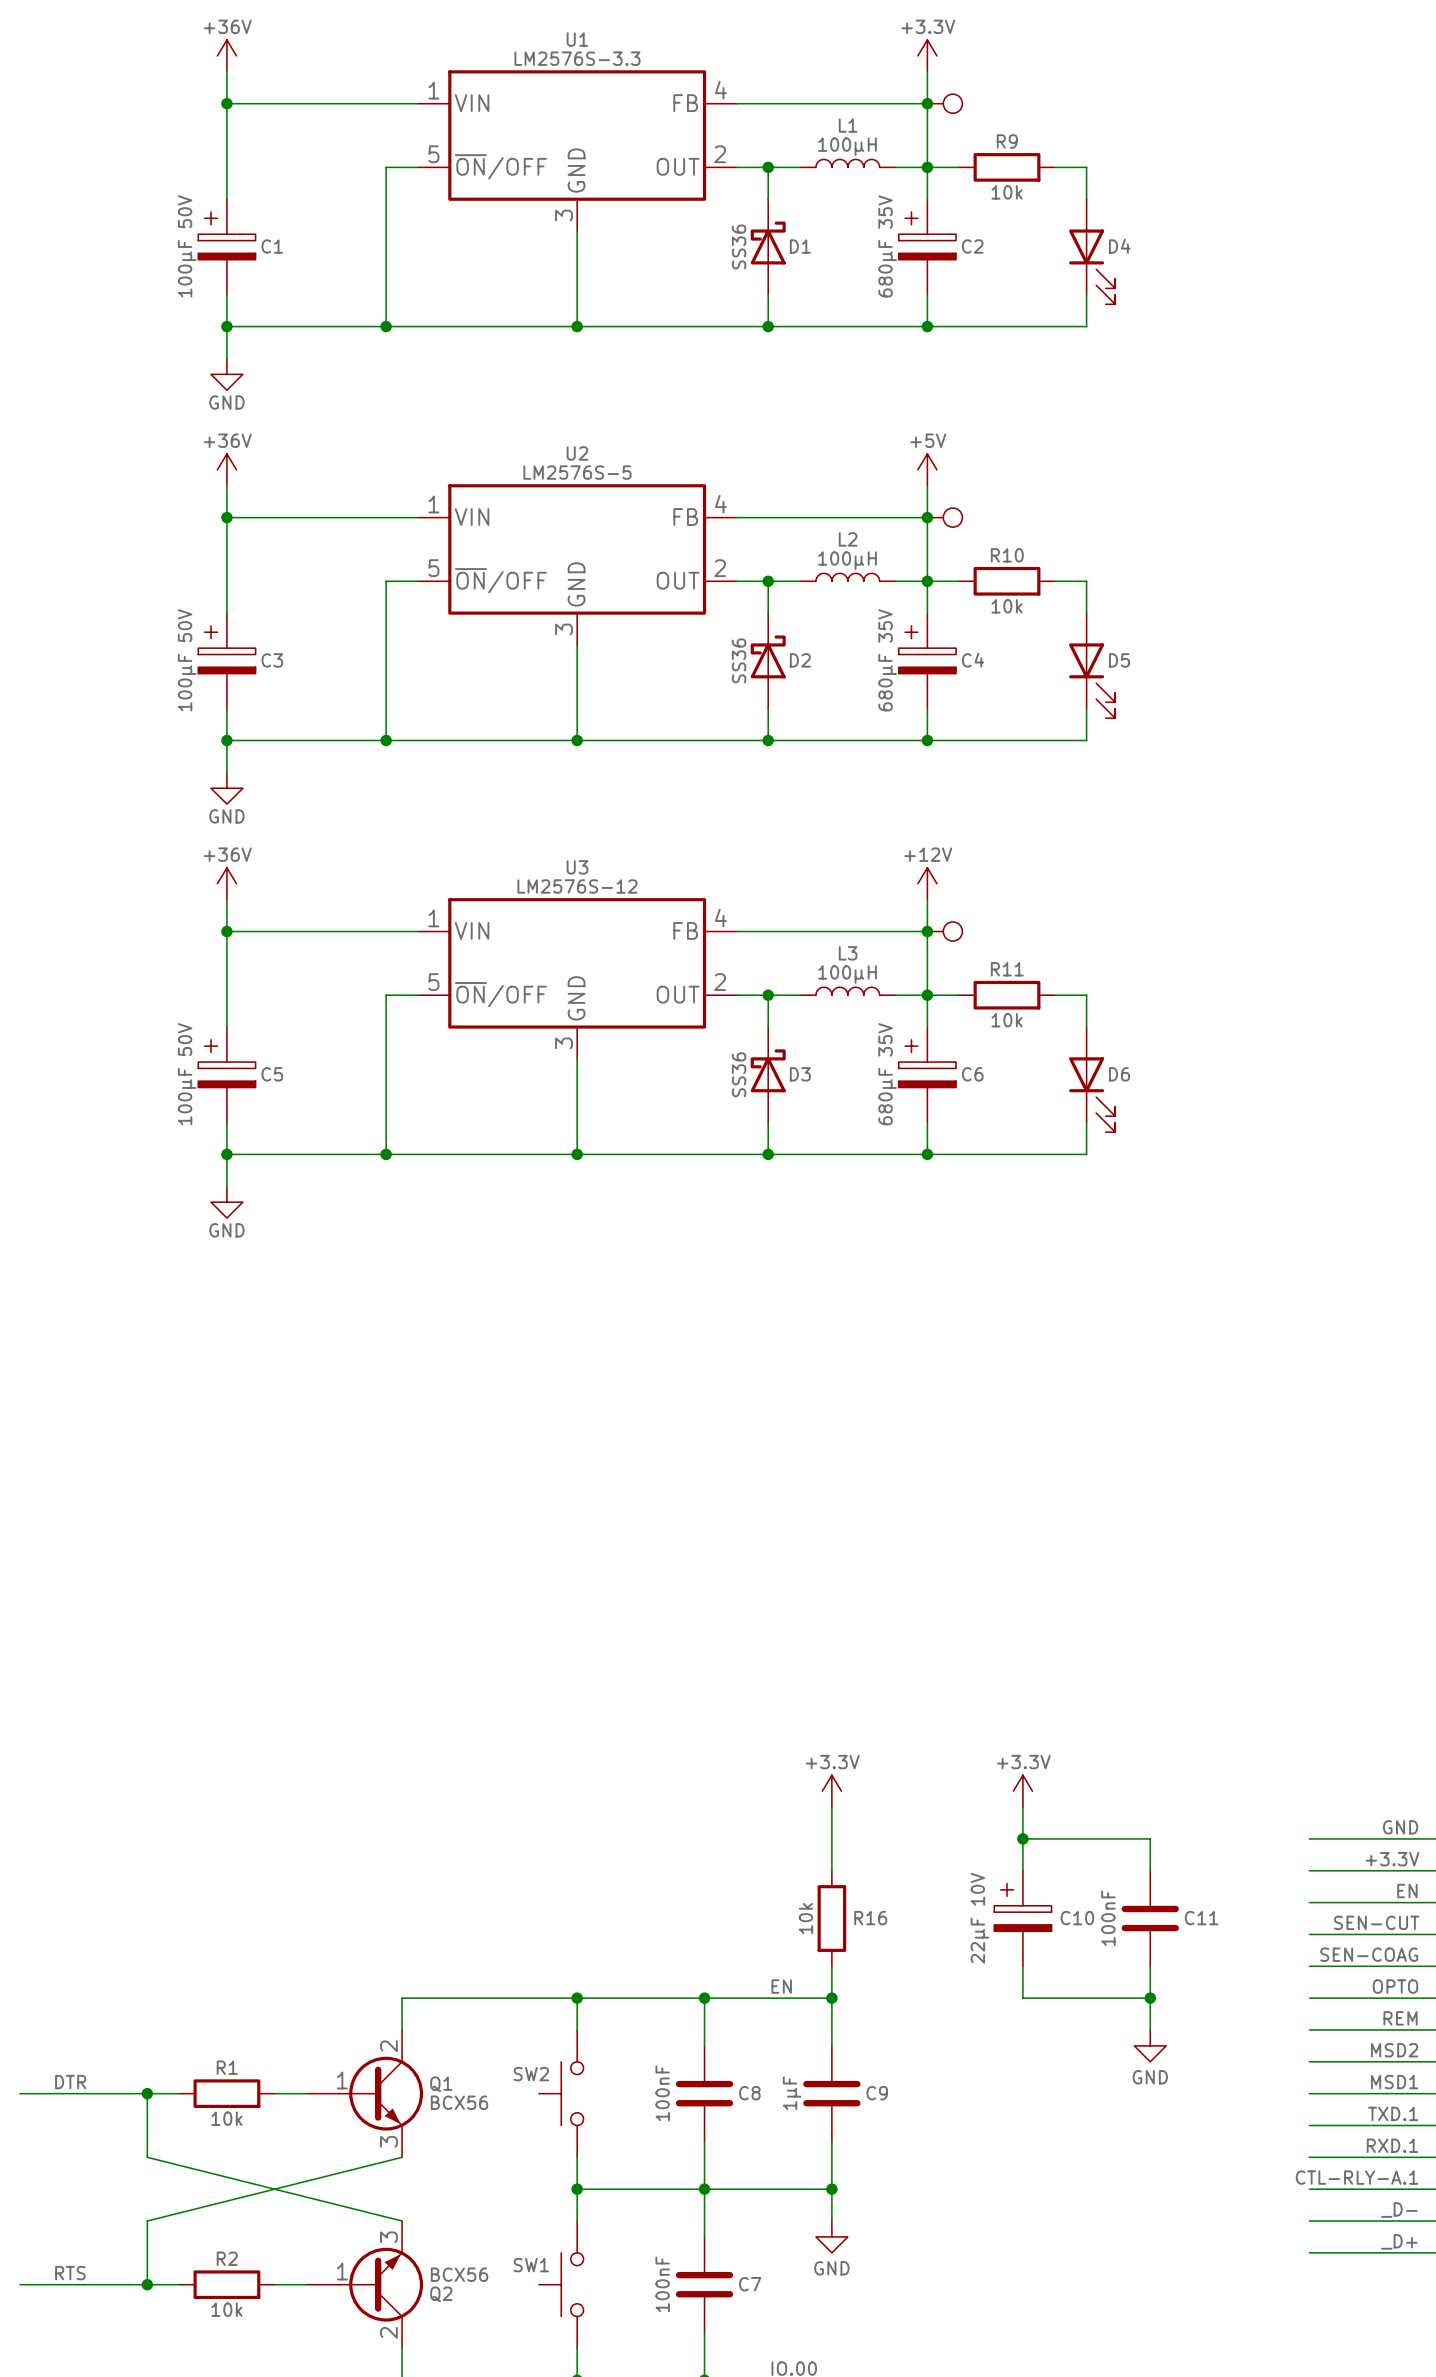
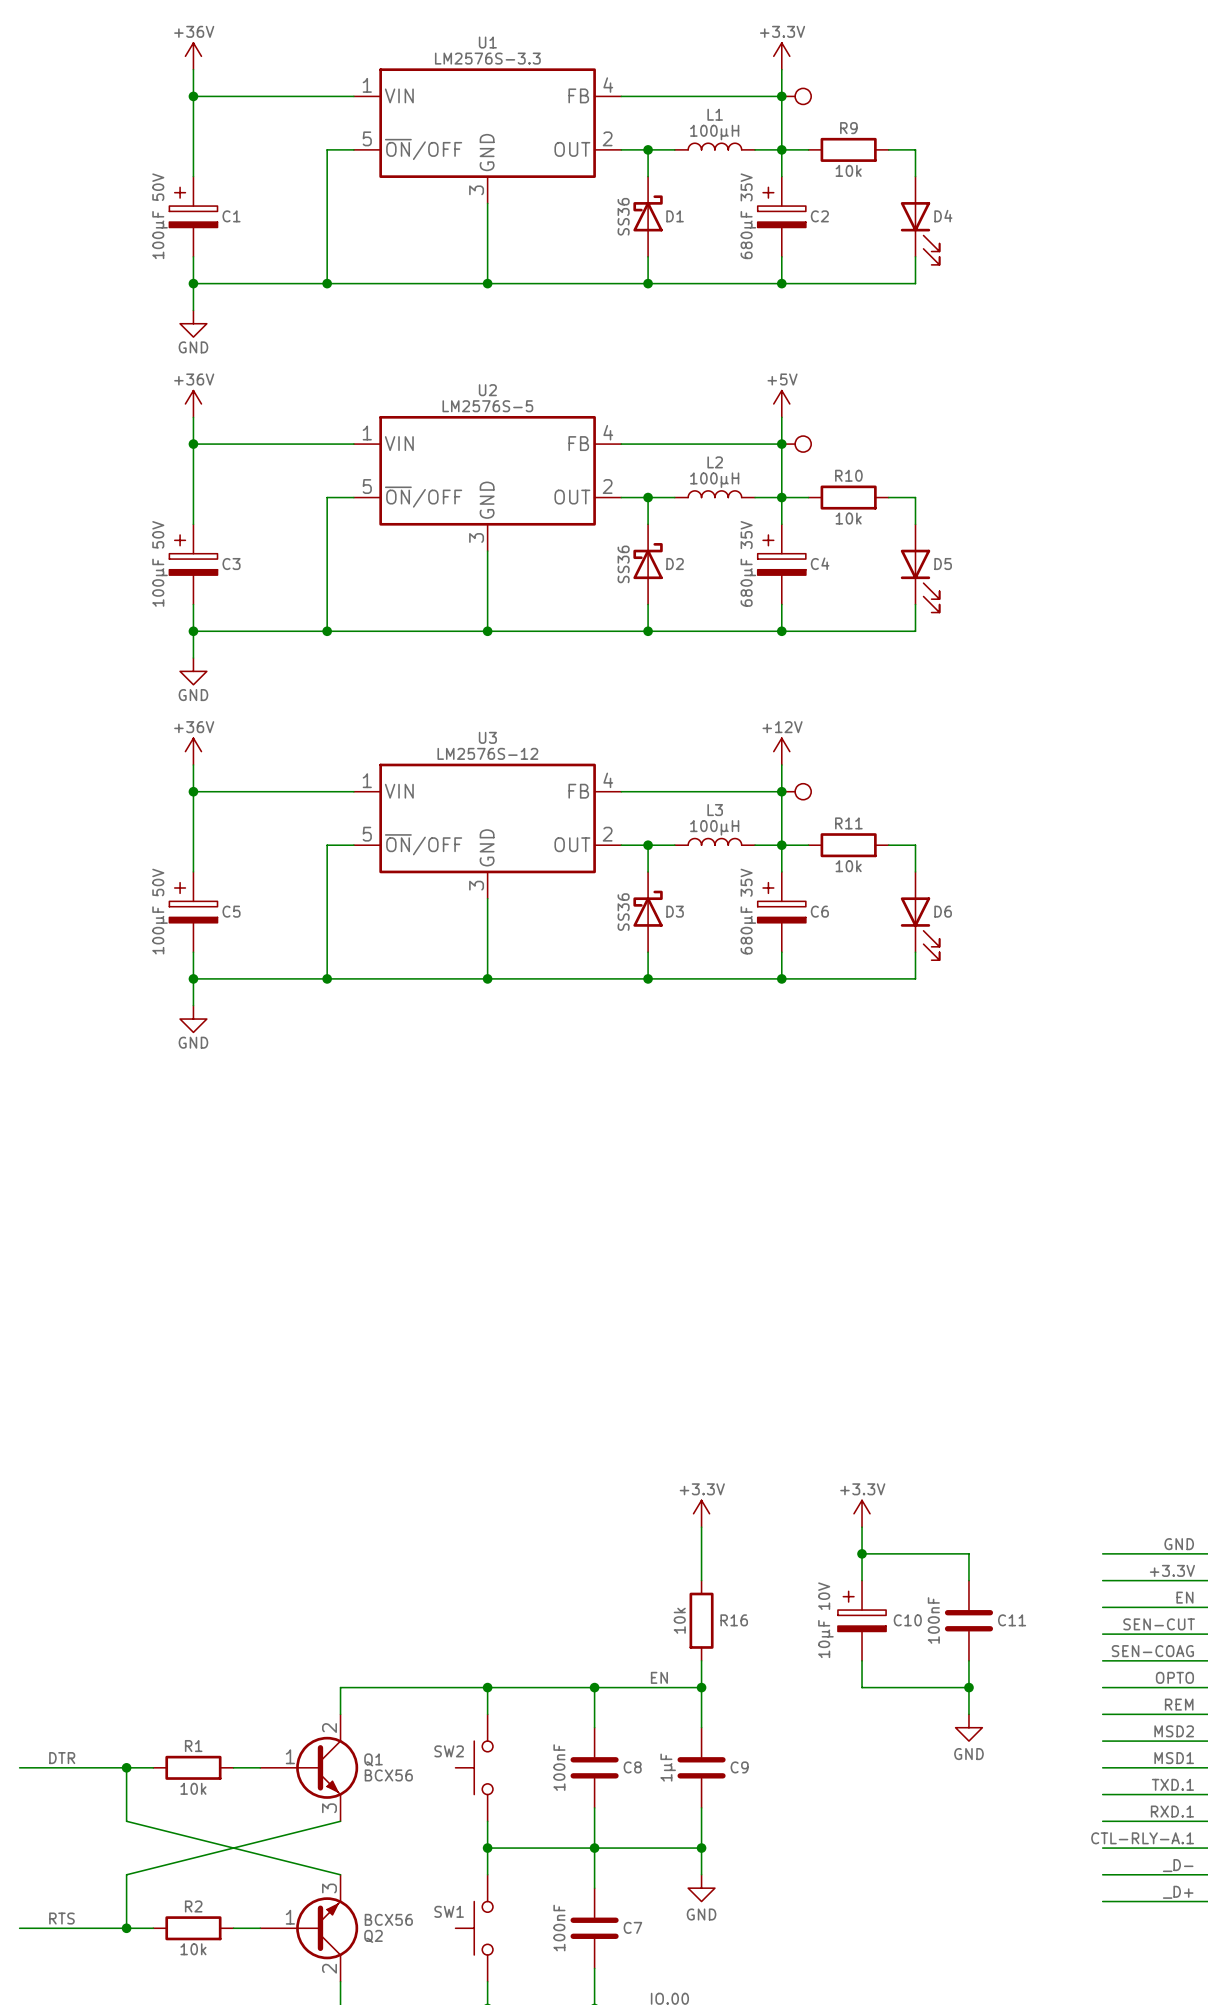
C10 value: 22µF 10V (979, 1918) -> 10µF 10V (825, 1620)

